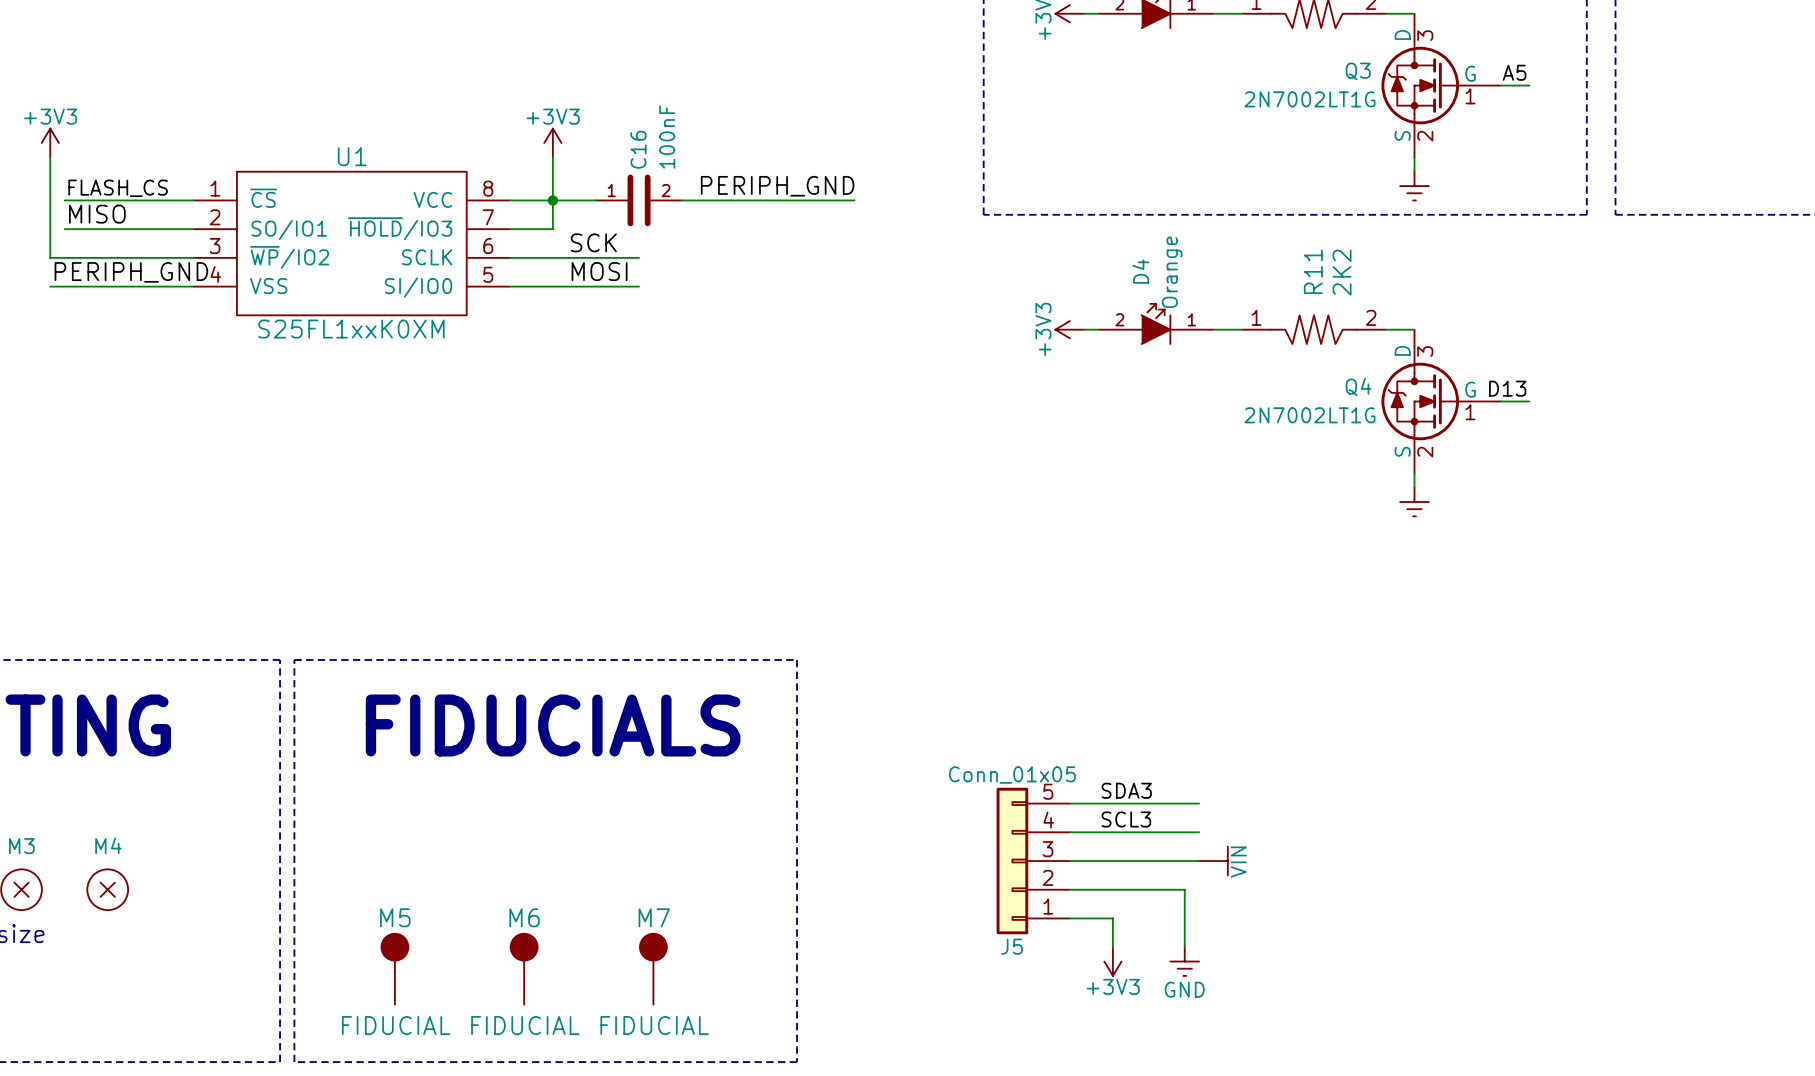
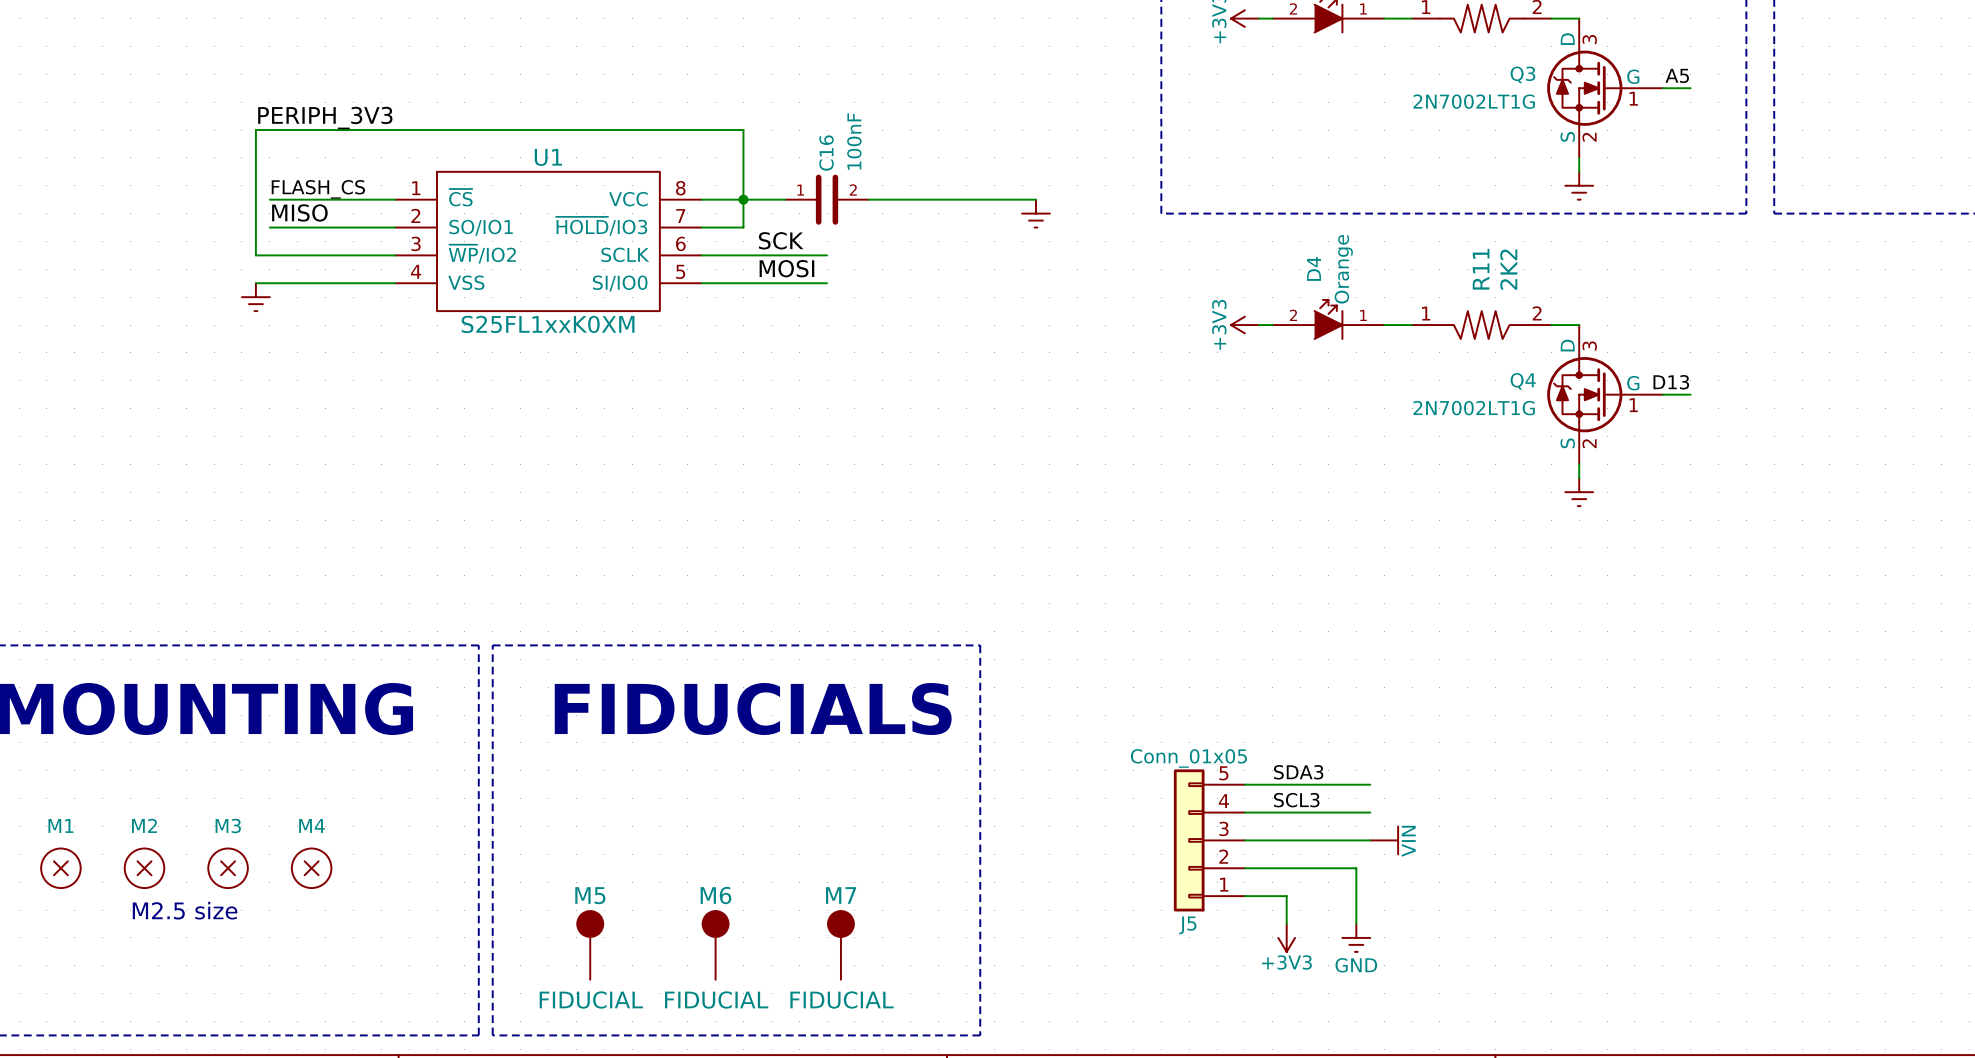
label: none -> PERIPH_3V3 (325, 117)
power symbol: +3V3 (50, 143) -> none
power symbol: +3V3 (552, 143) -> none
wire: none -> (255, 157) (255, 130) (743, 130) (743, 157)
label: PERIPH_GND (777, 186) -> none
power symbol: none -> (1035, 213)
label: PERIPH_GND (131, 272) -> none
power symbol: none -> (255, 297)

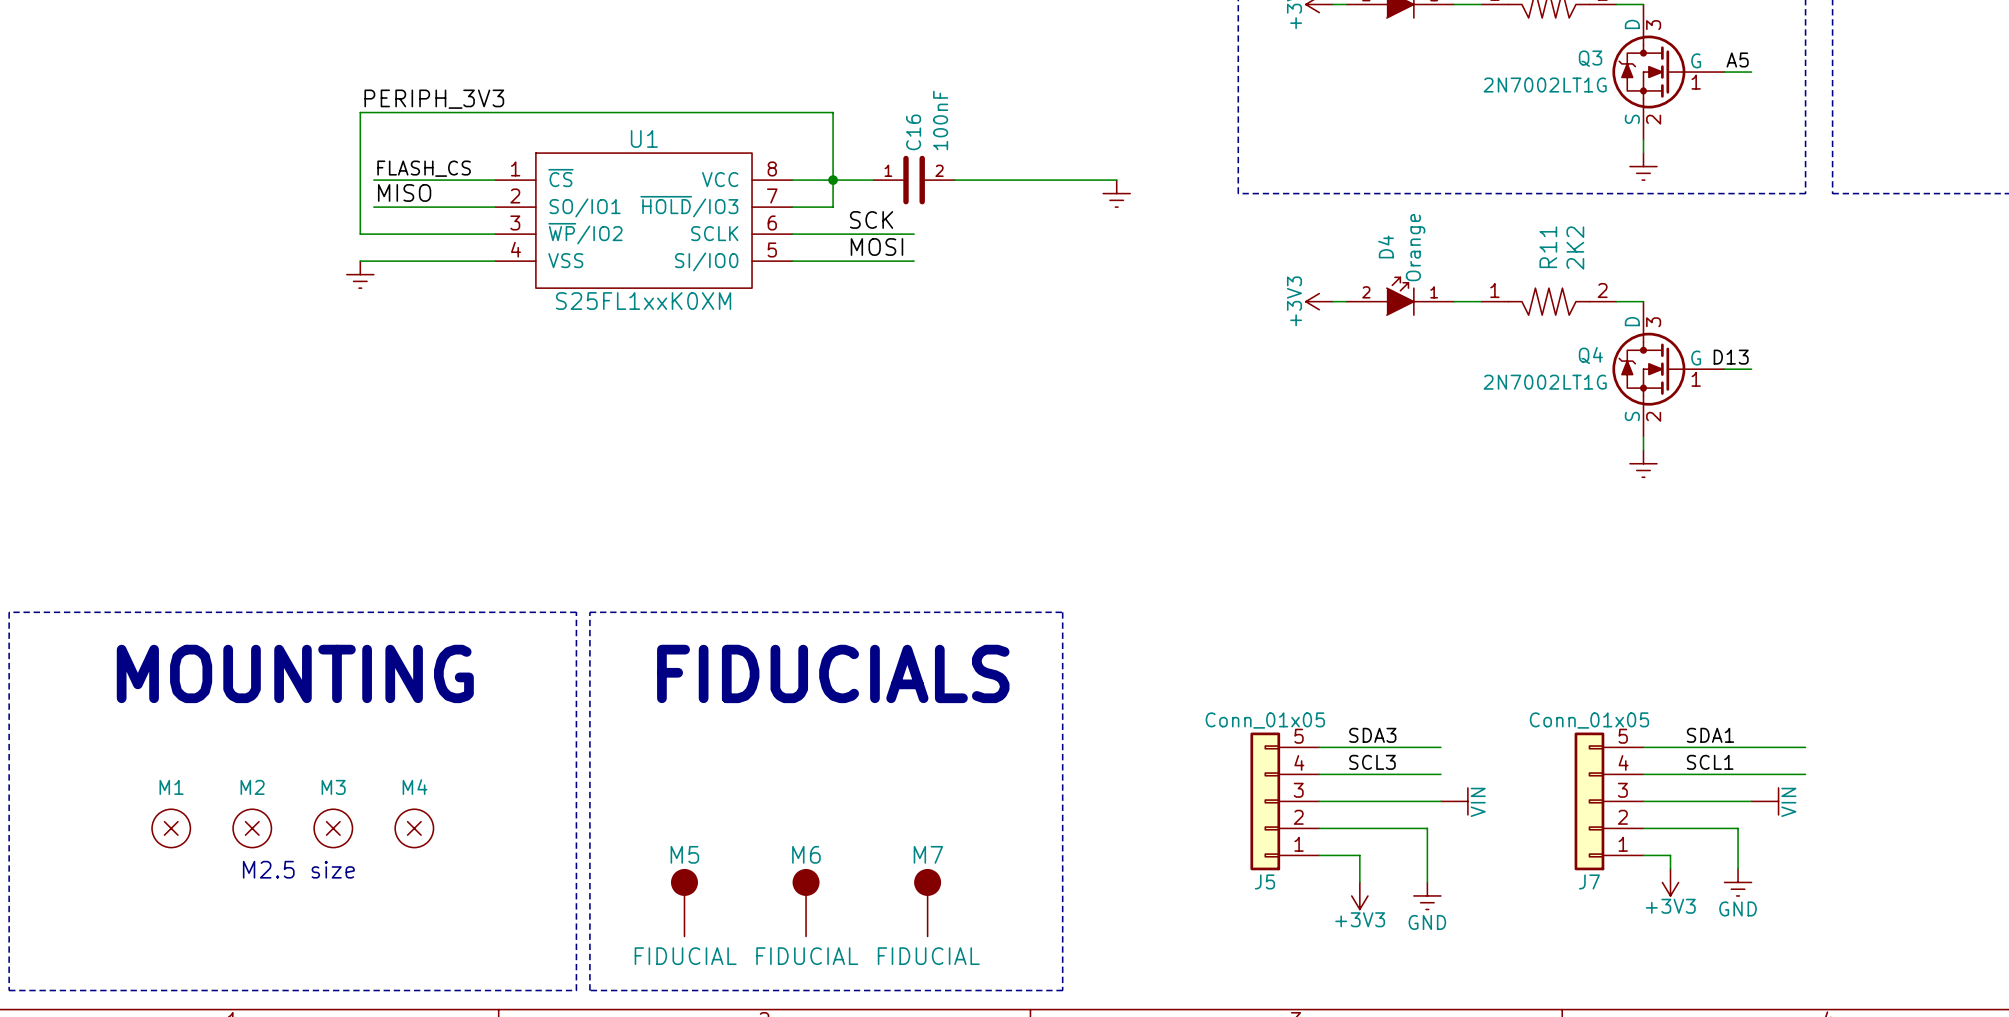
label: none -> SDA1 (1710, 735)
wire: none -> (1643, 747) (1805, 747)
label: none -> SCL1 (1710, 762)
wire: none -> (1643, 774) (1805, 774)
J7: none -> Conn_01x05 (1609, 801)
wire: none -> (1643, 801) (1751, 801)
power symbol: none -> VIN (1765, 801)
wire: none -> (1643, 828) (1738, 828) (1738, 868)
wire: none -> (1643, 855) (1670, 855) (1670, 868)
power symbol: none -> +3V3 (1670, 882)
power symbol: none -> GND (1738, 882)

